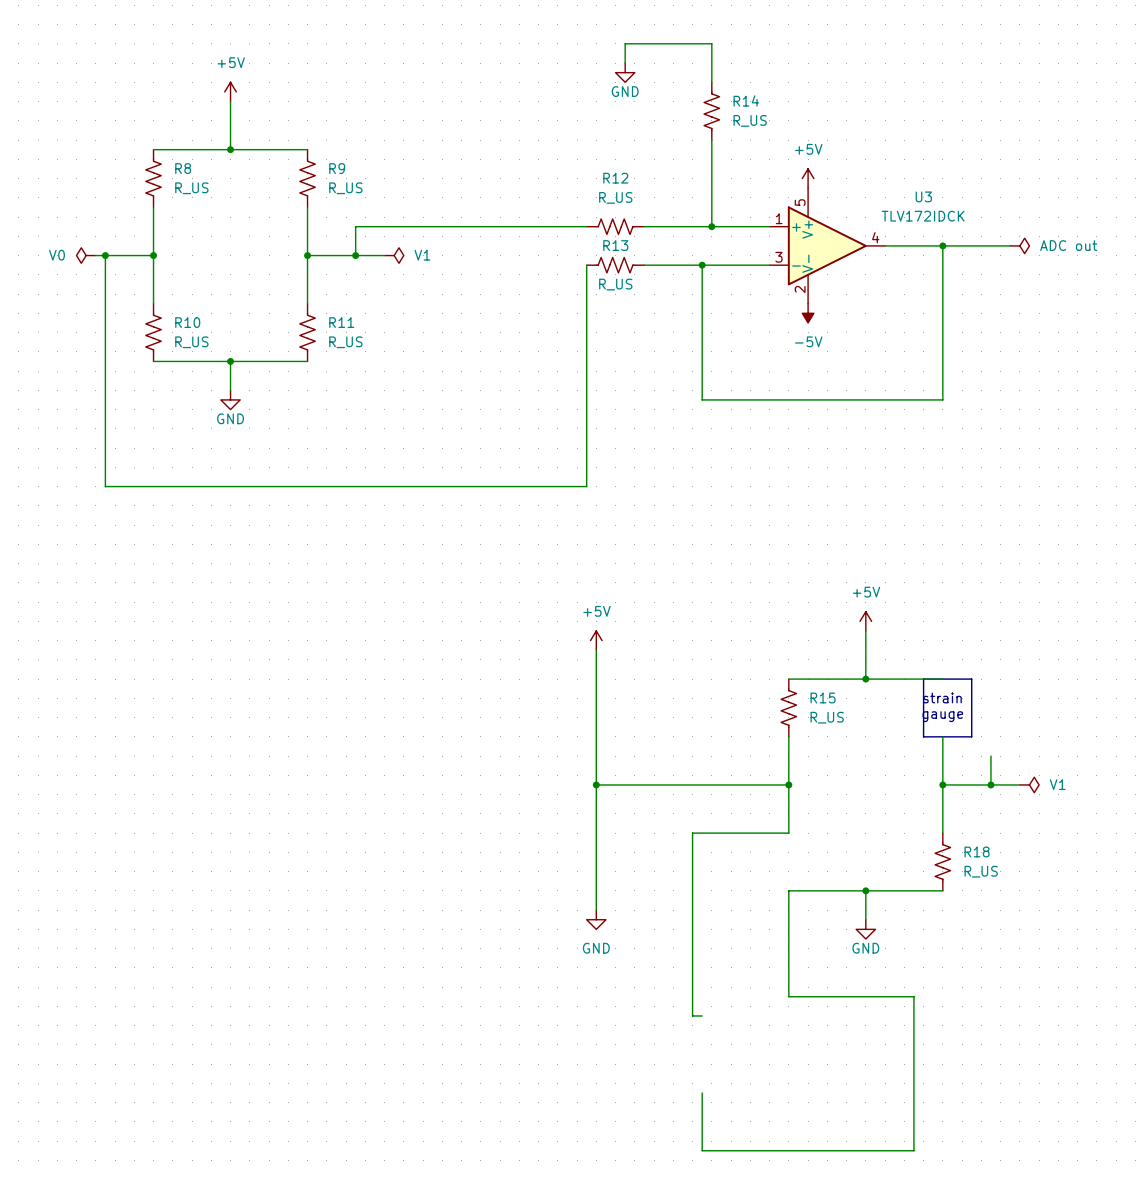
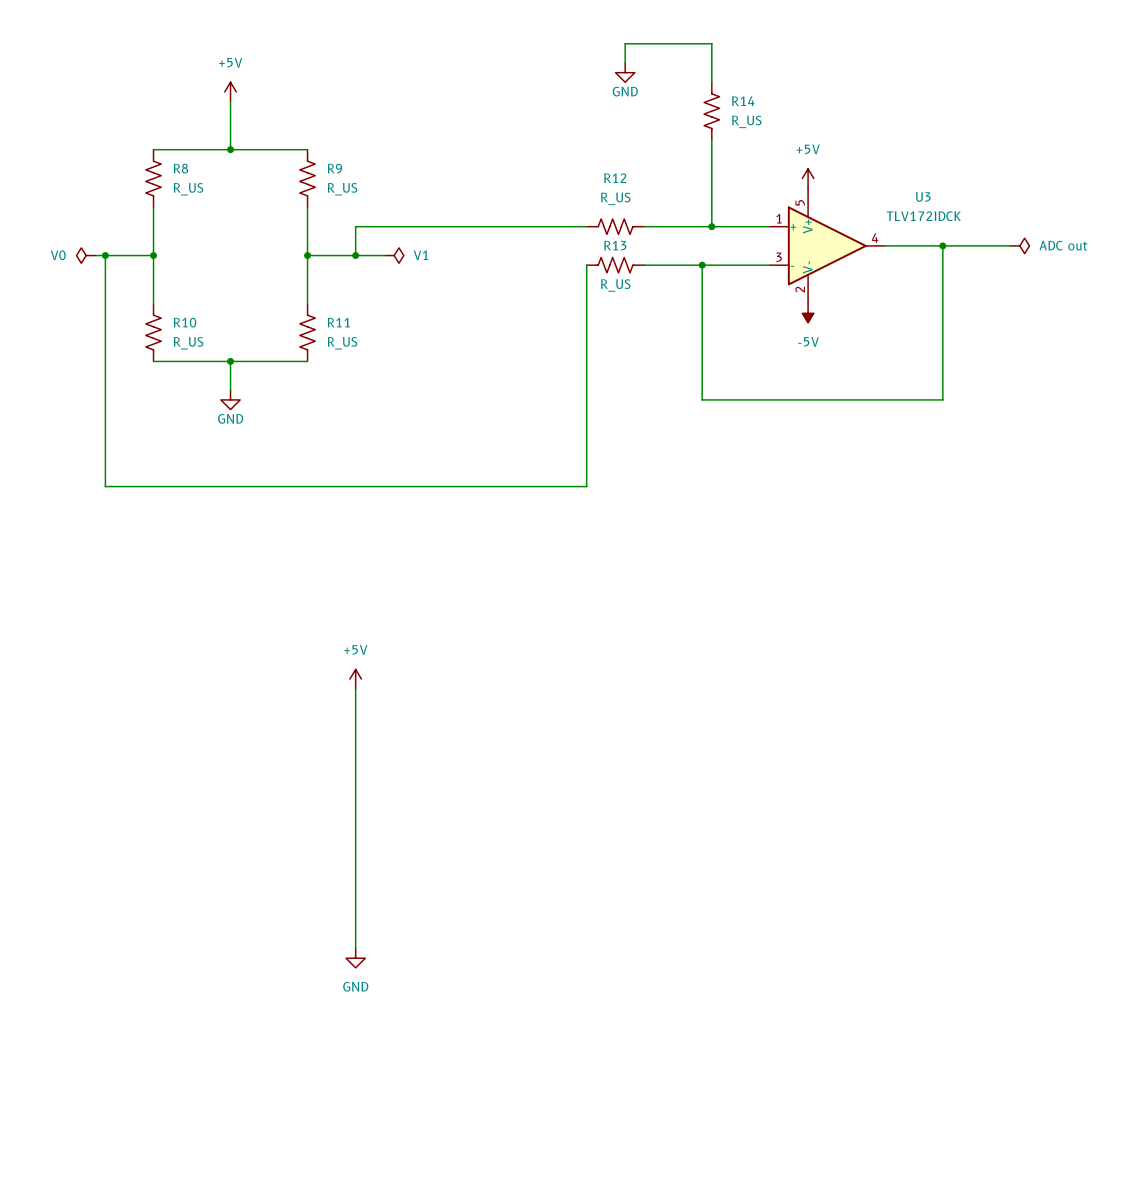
power symbol: +5V (865, 621) -> none
wire: (865, 630) (865, 679) -> none
power symbol: +5V (596, 640) -> none
wire: (596, 650) (596, 910) -> none
power symbol: none -> +5V (355, 679)
wire: (788, 679) (942, 679) -> none
junction: (865, 679) -> none
line: (923, 679) (971, 679) (971, 736) (923, 736) (923, 679) -> none
wire: none -> (355, 688) (355, 948)
text: strain (942, 697) -> none
R15: R_US (788, 707) -> none
text: gauge (942, 716) -> none
wire: (788, 736) (788, 833) (692, 833) (692, 1015) (702, 1015) -> none
wire: (942, 736) (942, 833) -> none
wire: (990, 756) (990, 784) -> none
wire: (596, 784) (788, 784) -> none
junction: (596, 784) -> none
junction: (788, 784) -> none
wire: (942, 784) (1019, 784) -> none
junction: (942, 784) -> none
junction: (990, 784) -> none
power symbol: V1 (1029, 784) -> none
R18: R_US (942, 861) -> none
wire: (865, 890) (865, 919) -> none
junction: (865, 890) -> none
wire: (942, 890) (788, 890) (788, 996) (913, 996) (913, 1150) (702, 1150) (702, 1092) -> none
power symbol: GND (596, 919) -> none
power symbol: GND (865, 929) -> none
power symbol: none -> GND (355, 958)

